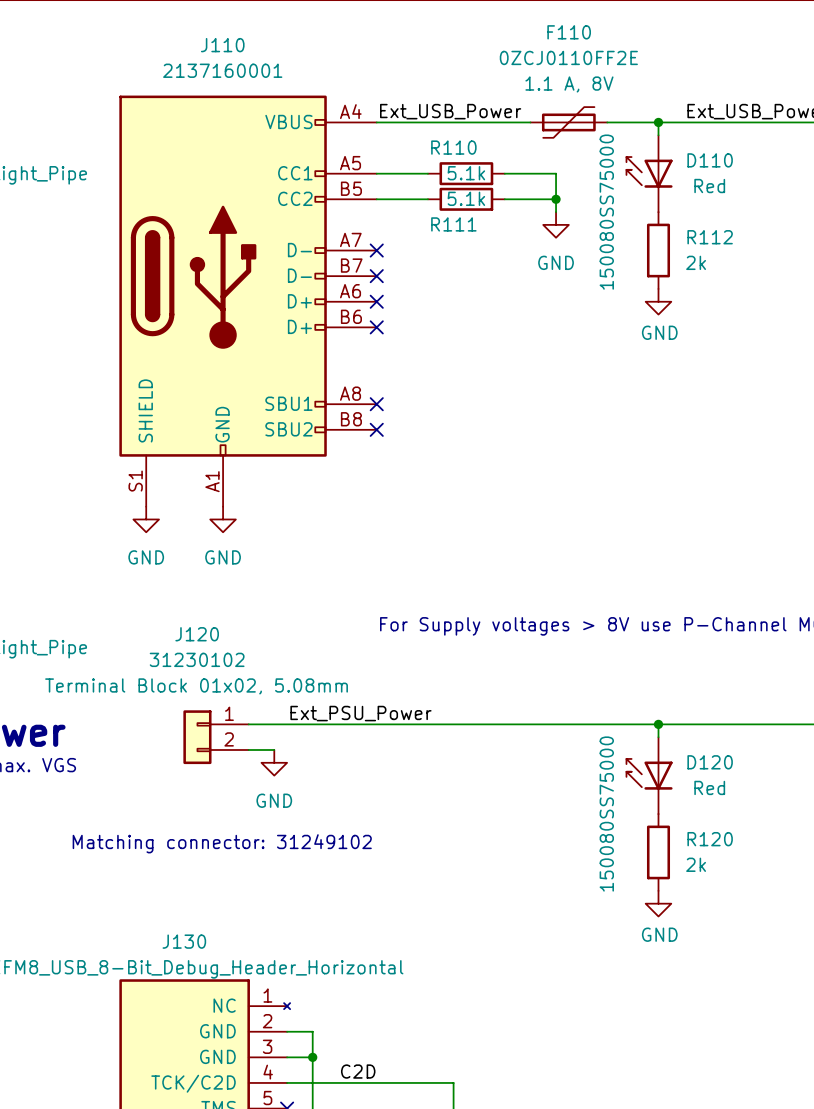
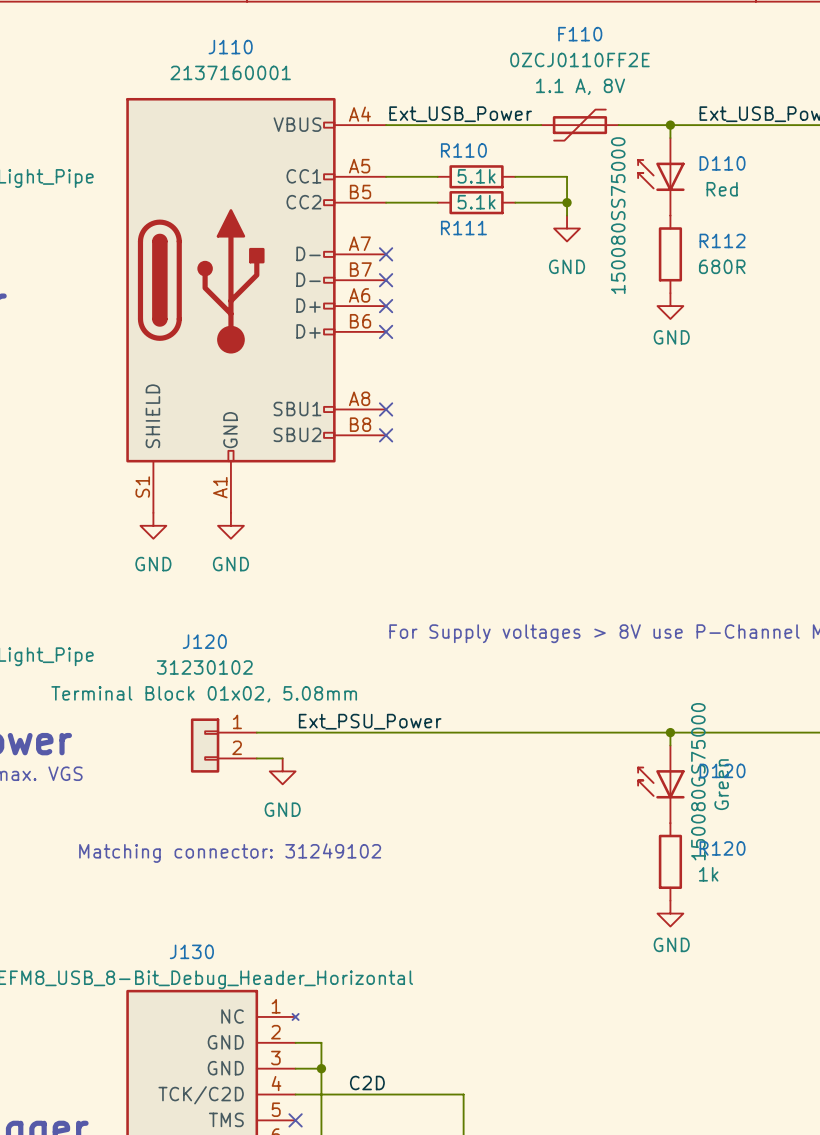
R112 text: 2k (696, 262) -> 680R (722, 266)
D120 text: Red (709, 787) -> Green (721, 784)
D120 value: 150080SS75000 (606, 814) -> 150080GS75000 (698, 781)
R120 text: 2k (696, 864) -> 1k (708, 874)

